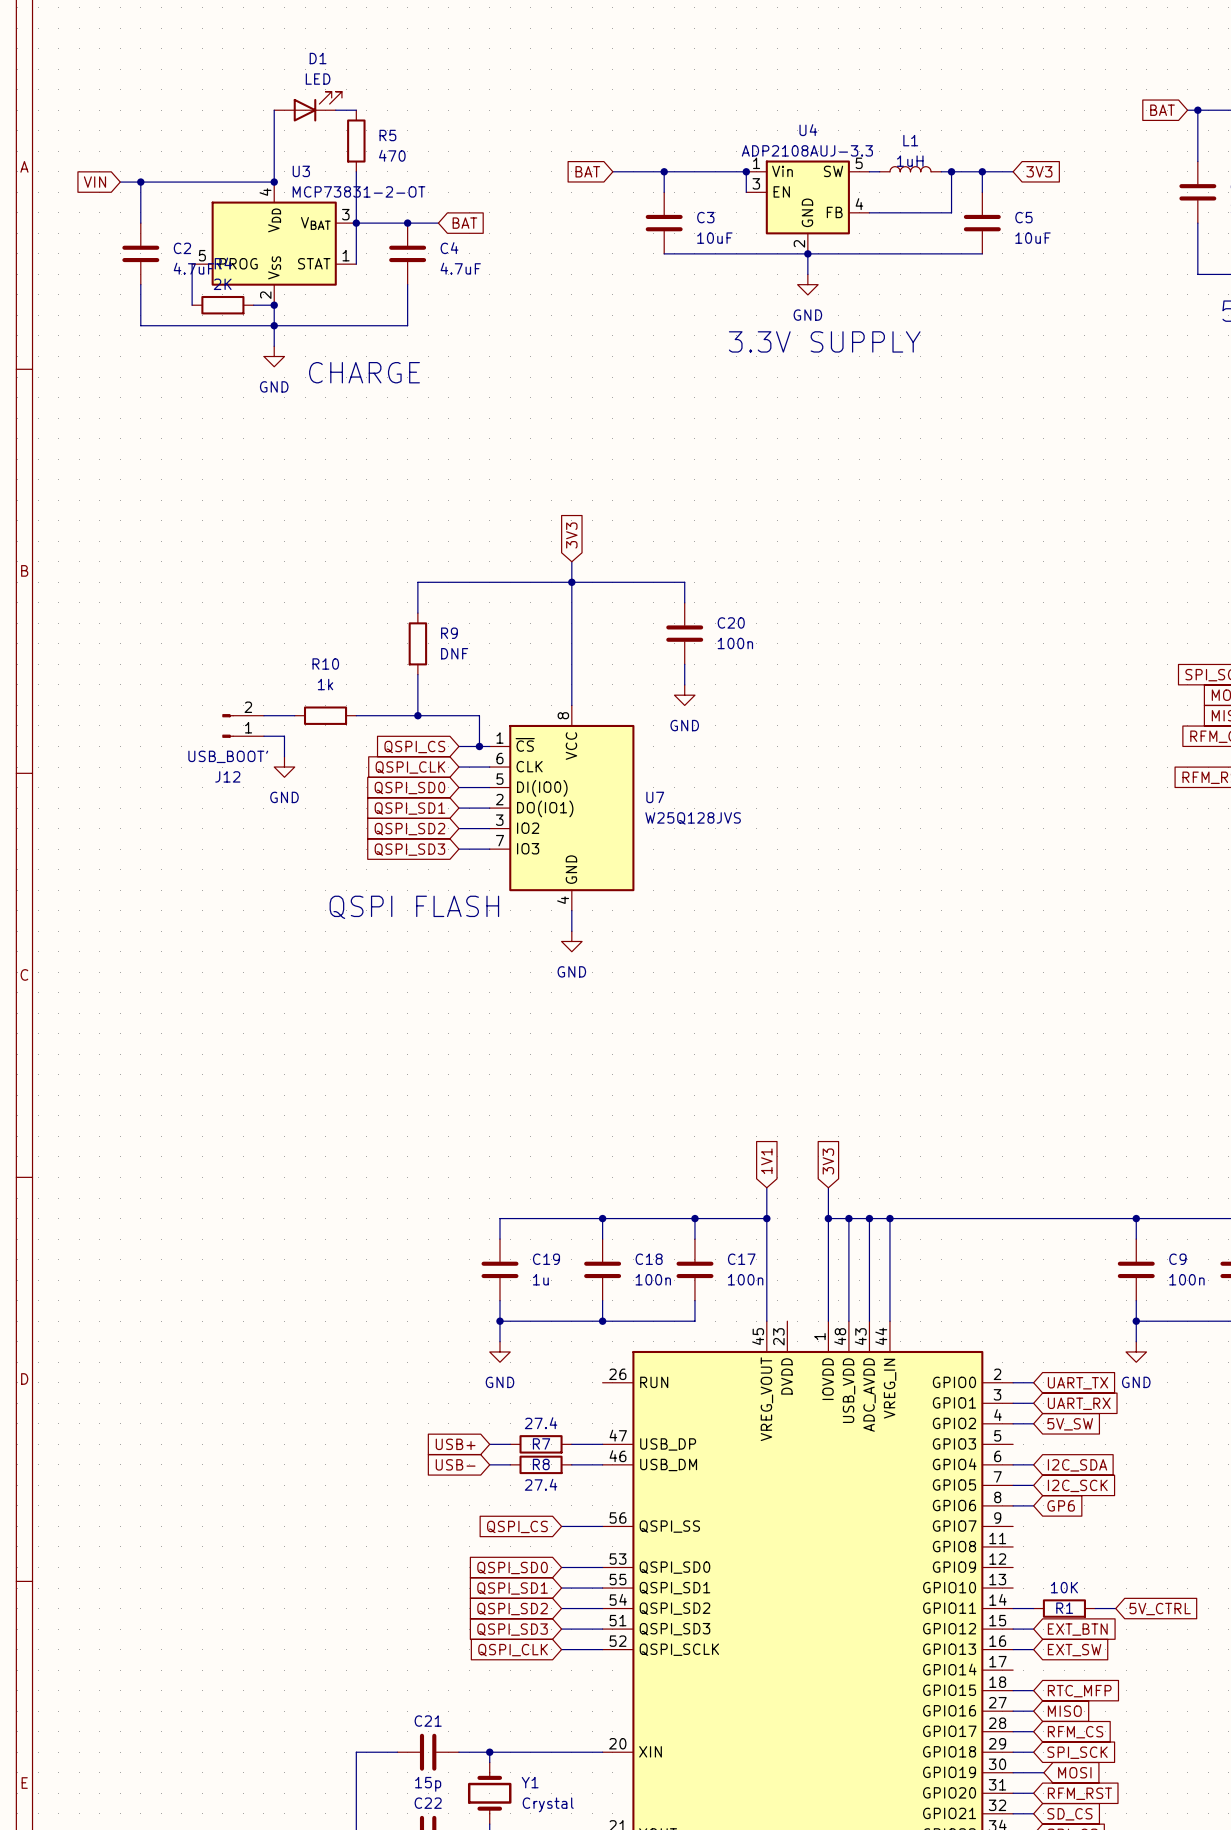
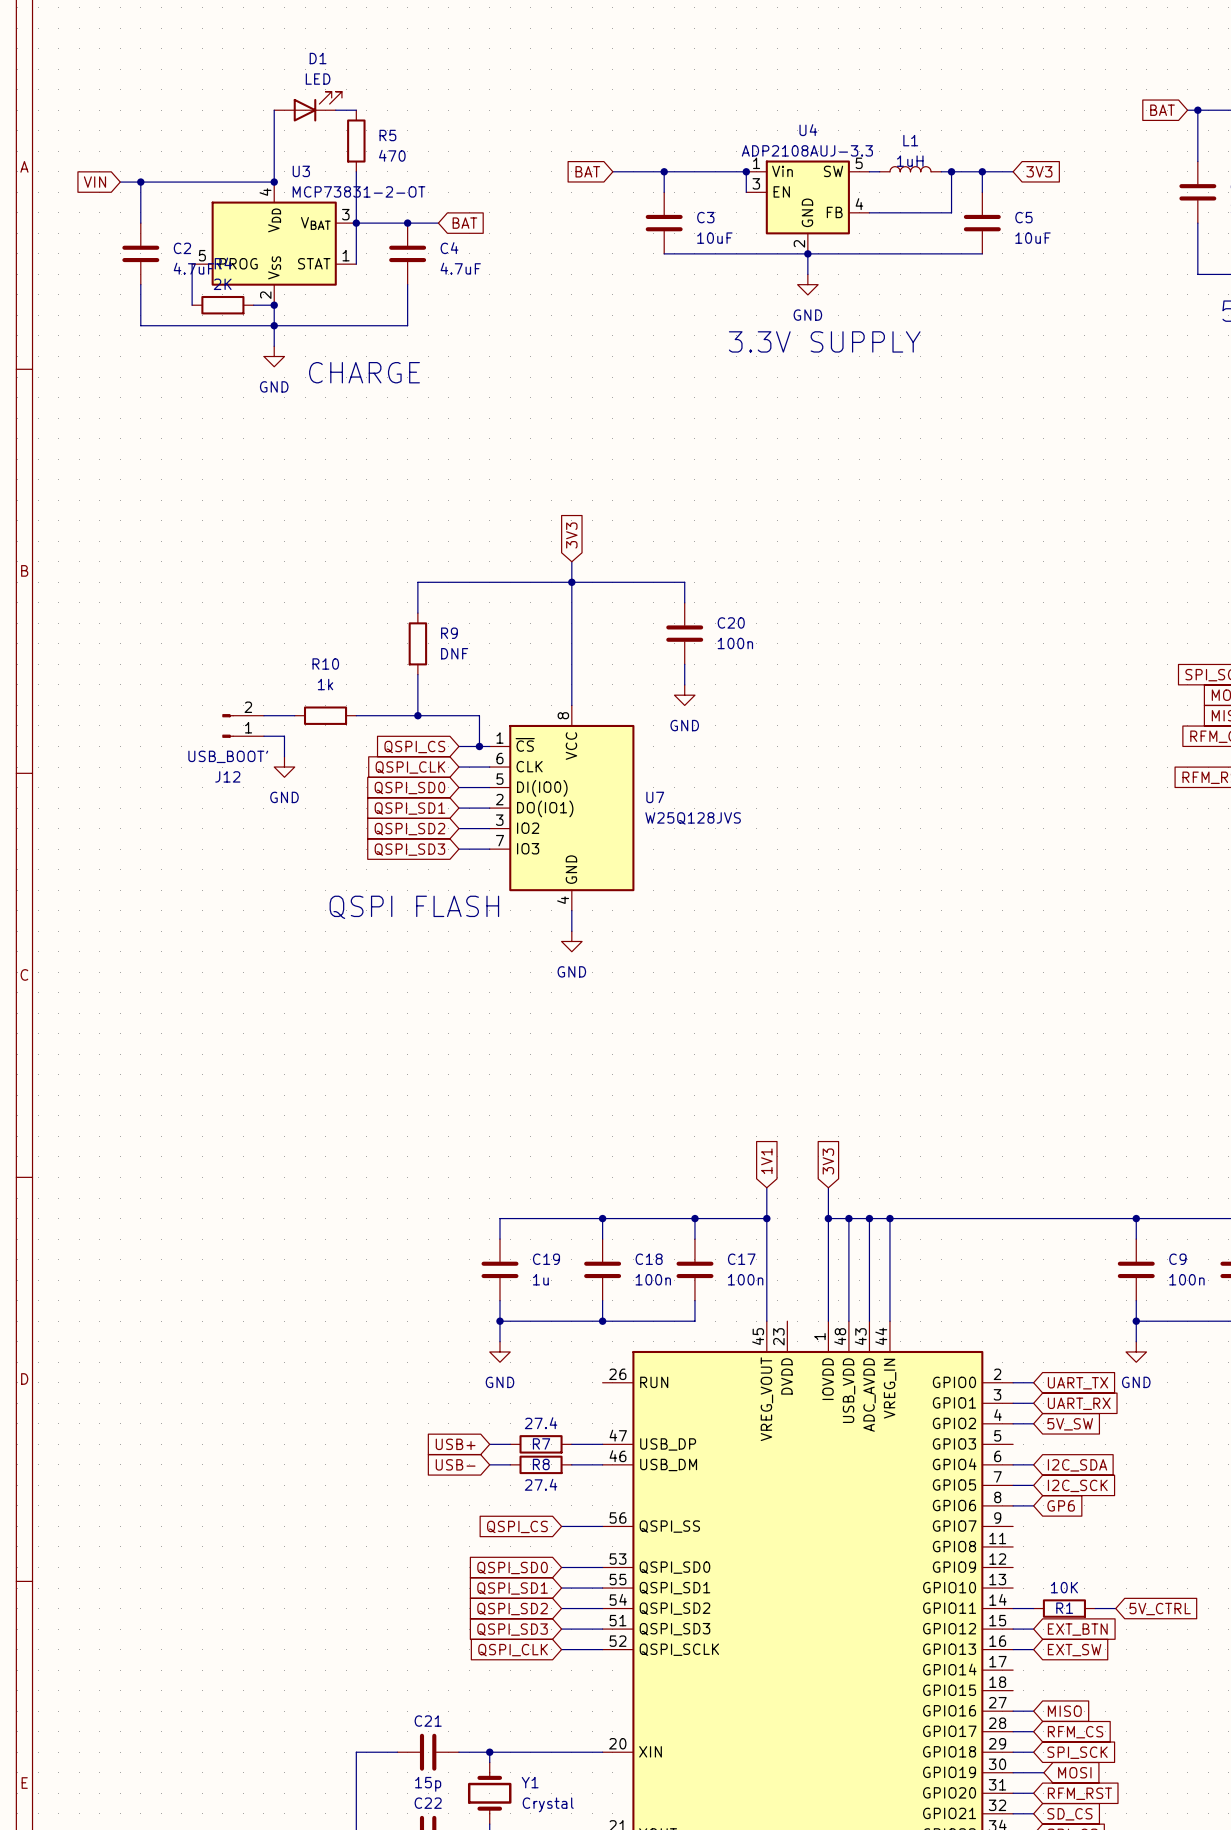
wire: (1013, 1690) (1033, 1690) -> none
global label: RTC_MFP (1079, 1691) -> none

